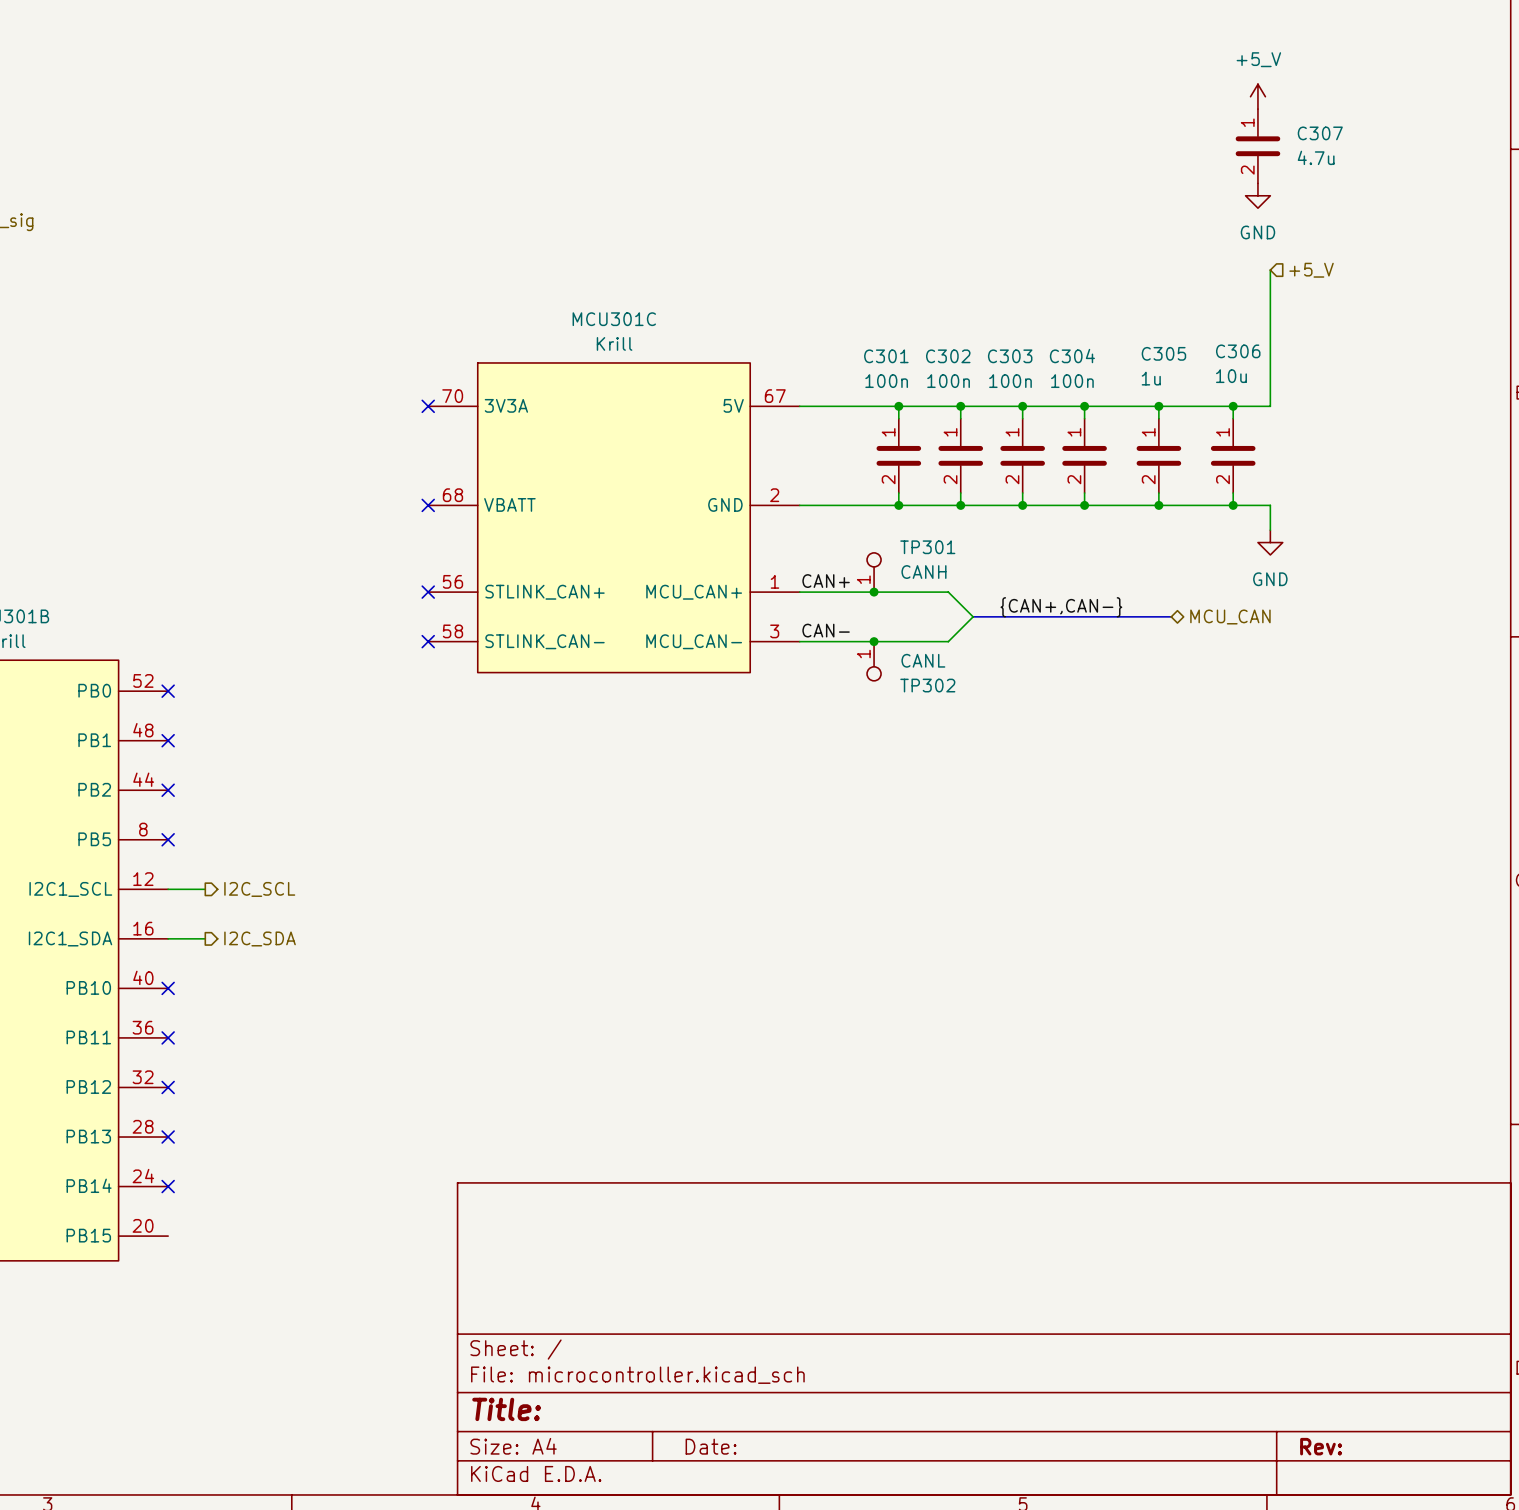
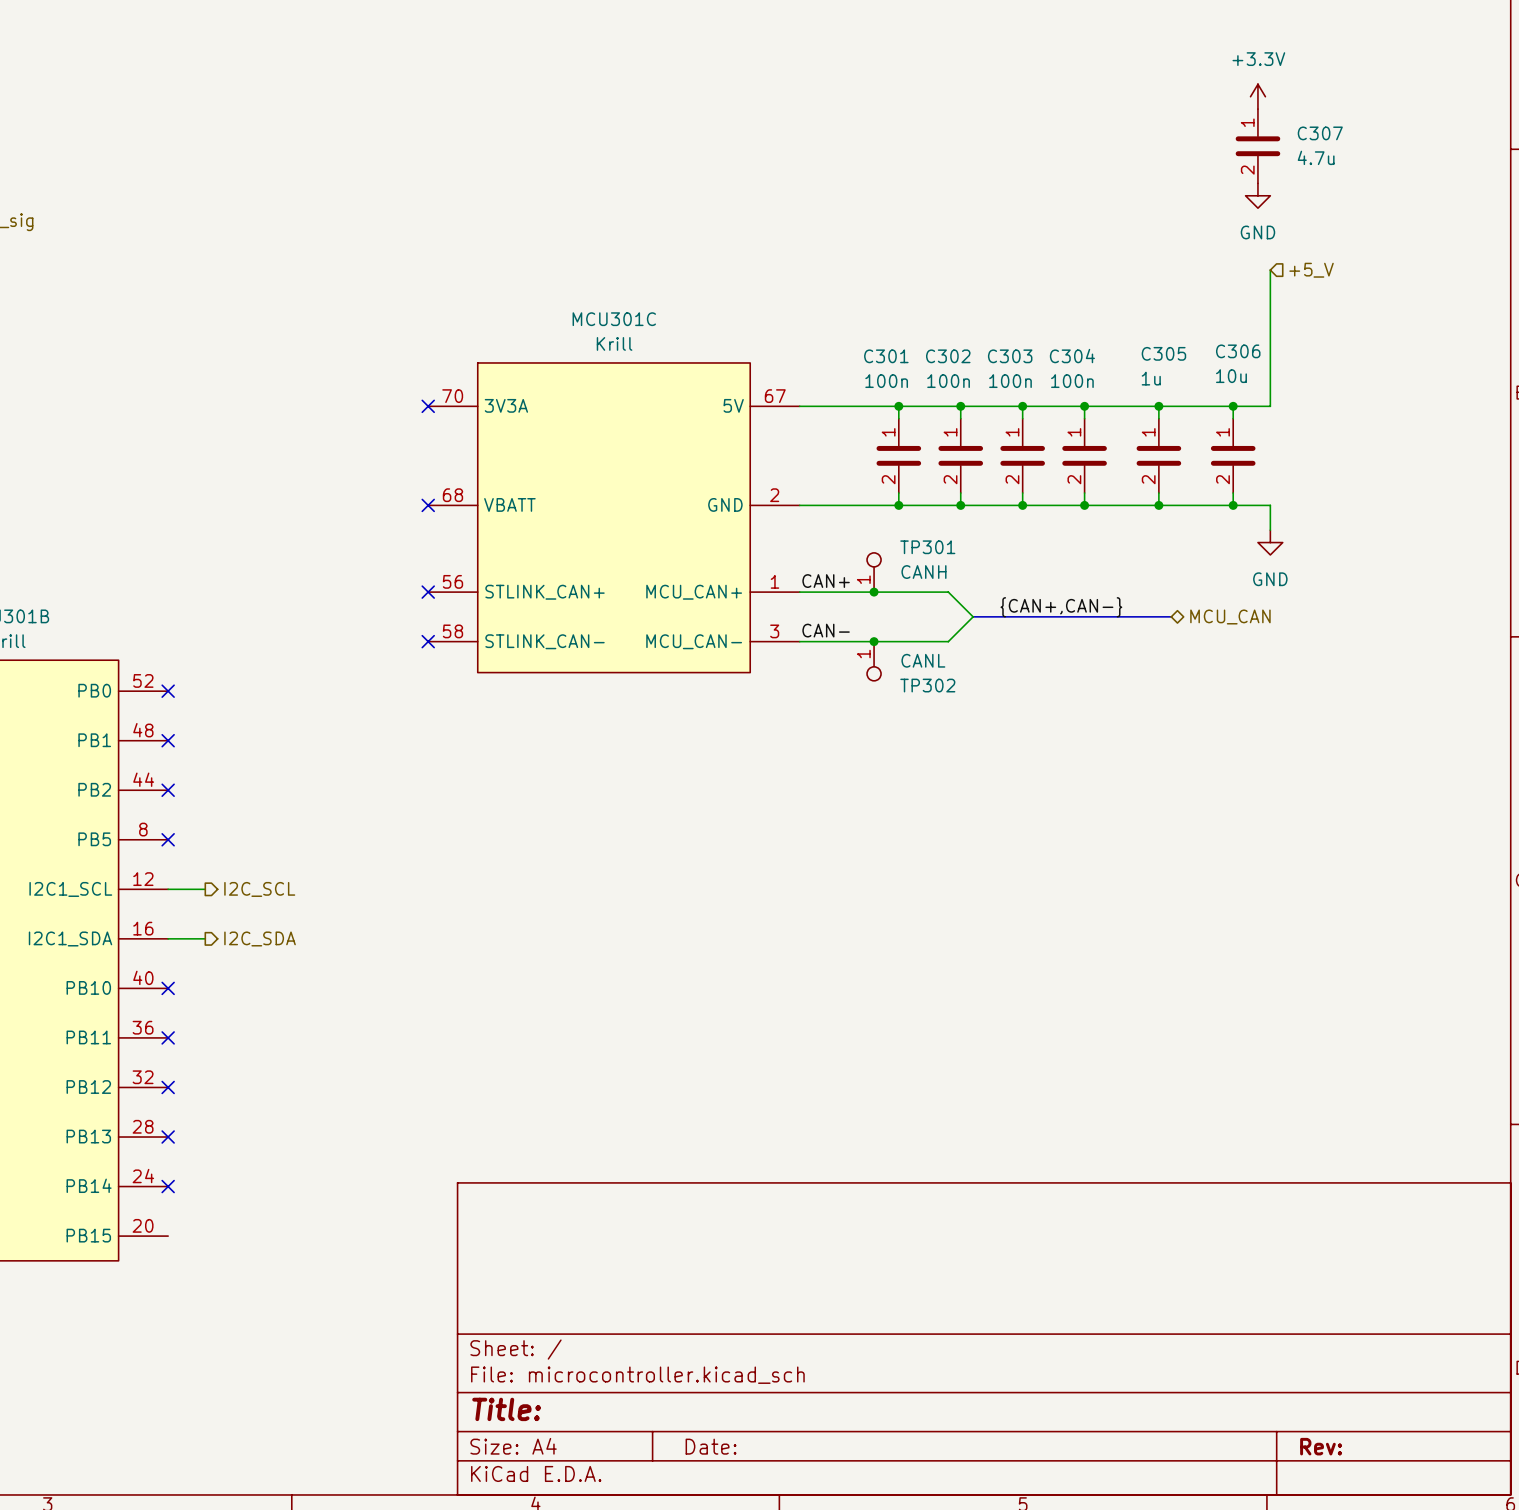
power symbol: +5_V (1257, 96) -> +3.3V (1257, 96)

